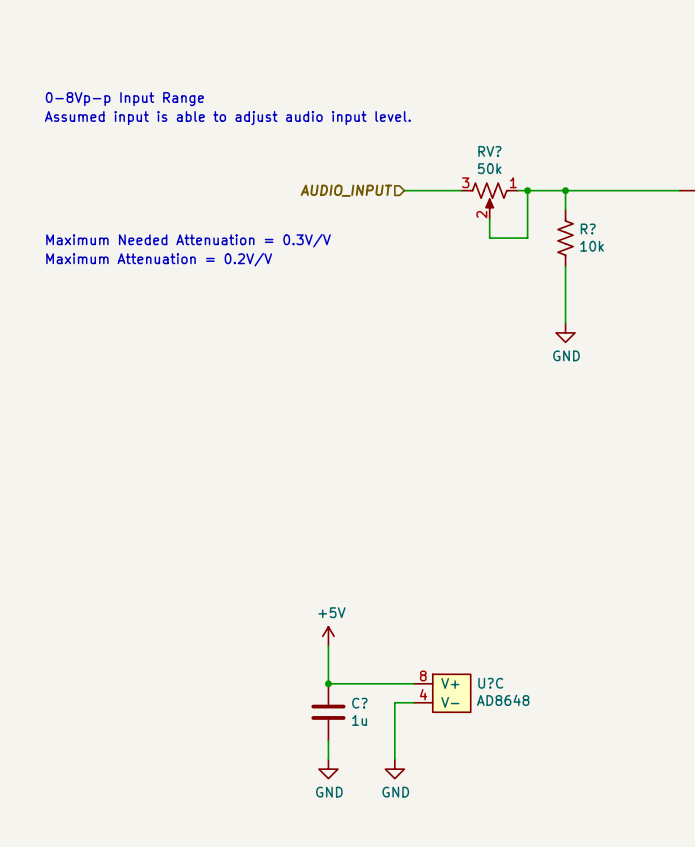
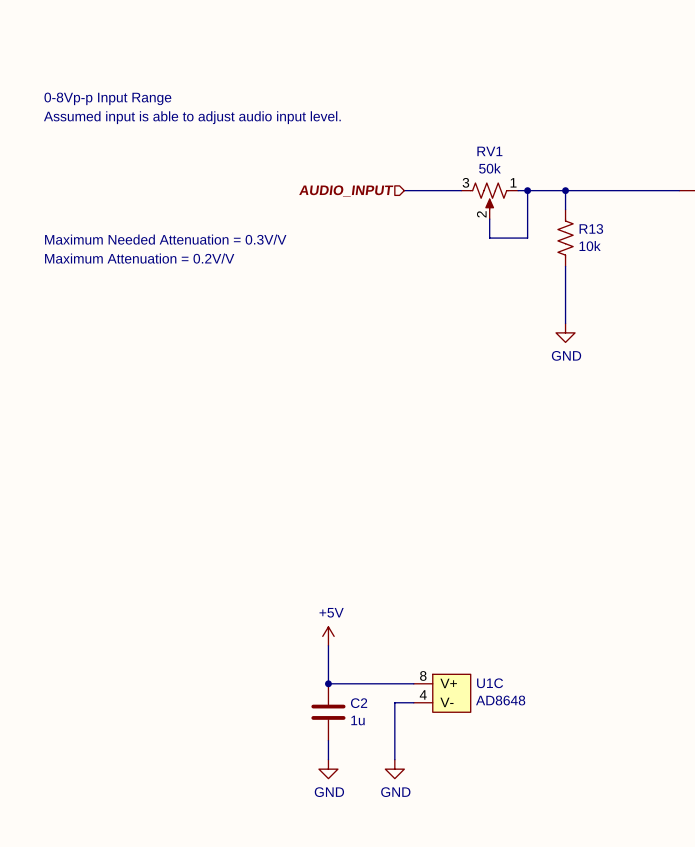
RV? name: RV? (489, 151) -> RV1 (489, 151)
R? name: R? (588, 228) -> R13 (591, 228)
U?C name: U?C (490, 683) -> U1C (490, 683)
C? name: C? (359, 703) -> C2 (359, 703)

